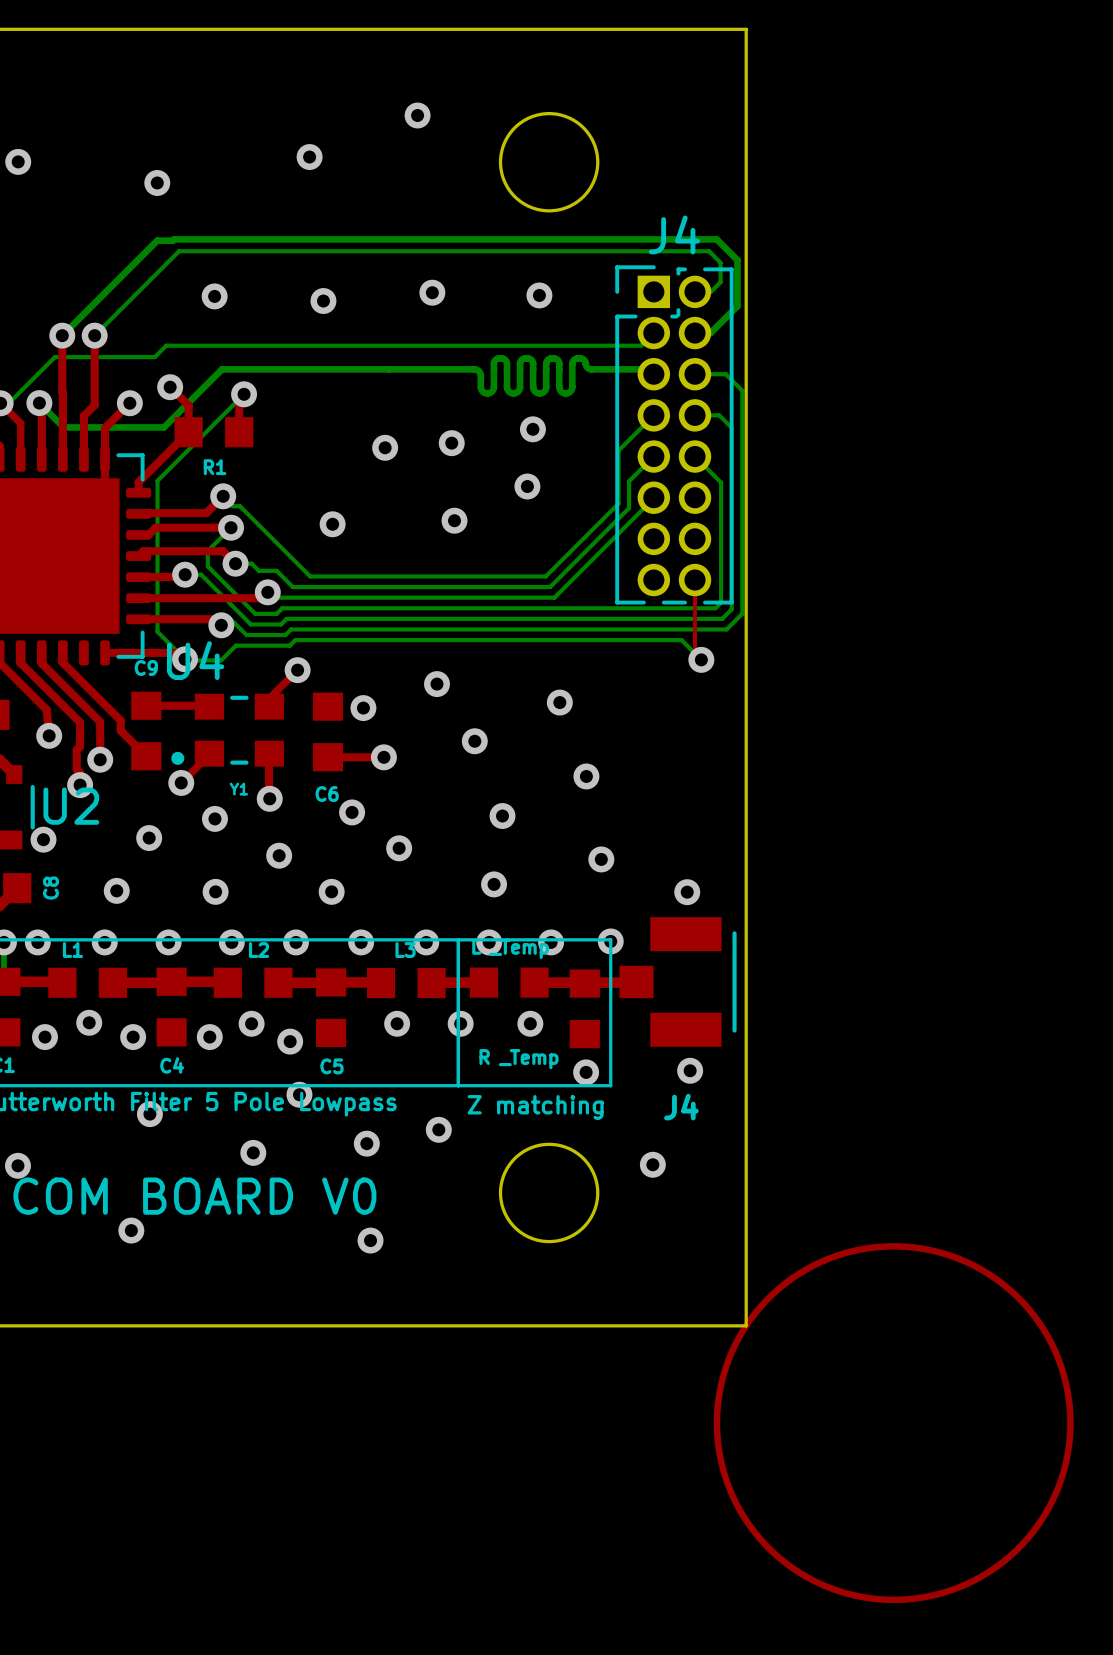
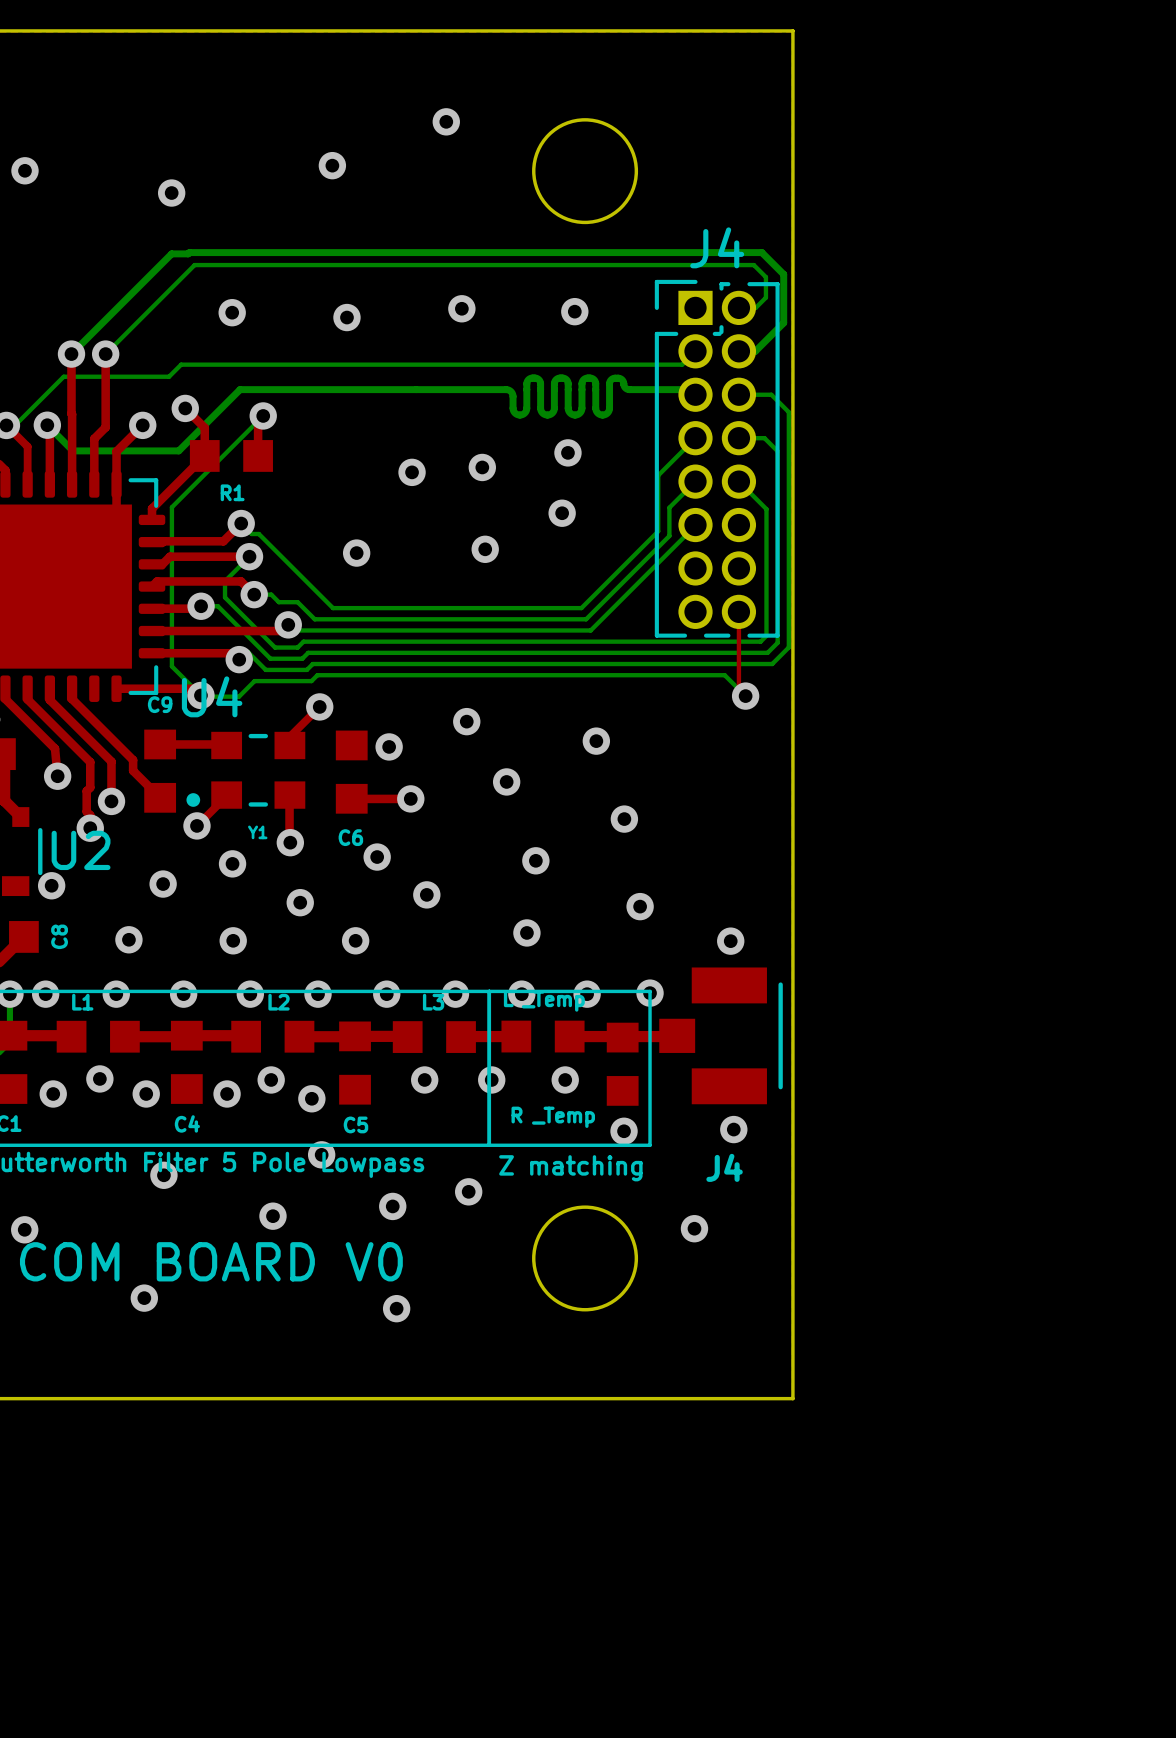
drawing: [713, 1243, 1074, 1604] -> none

